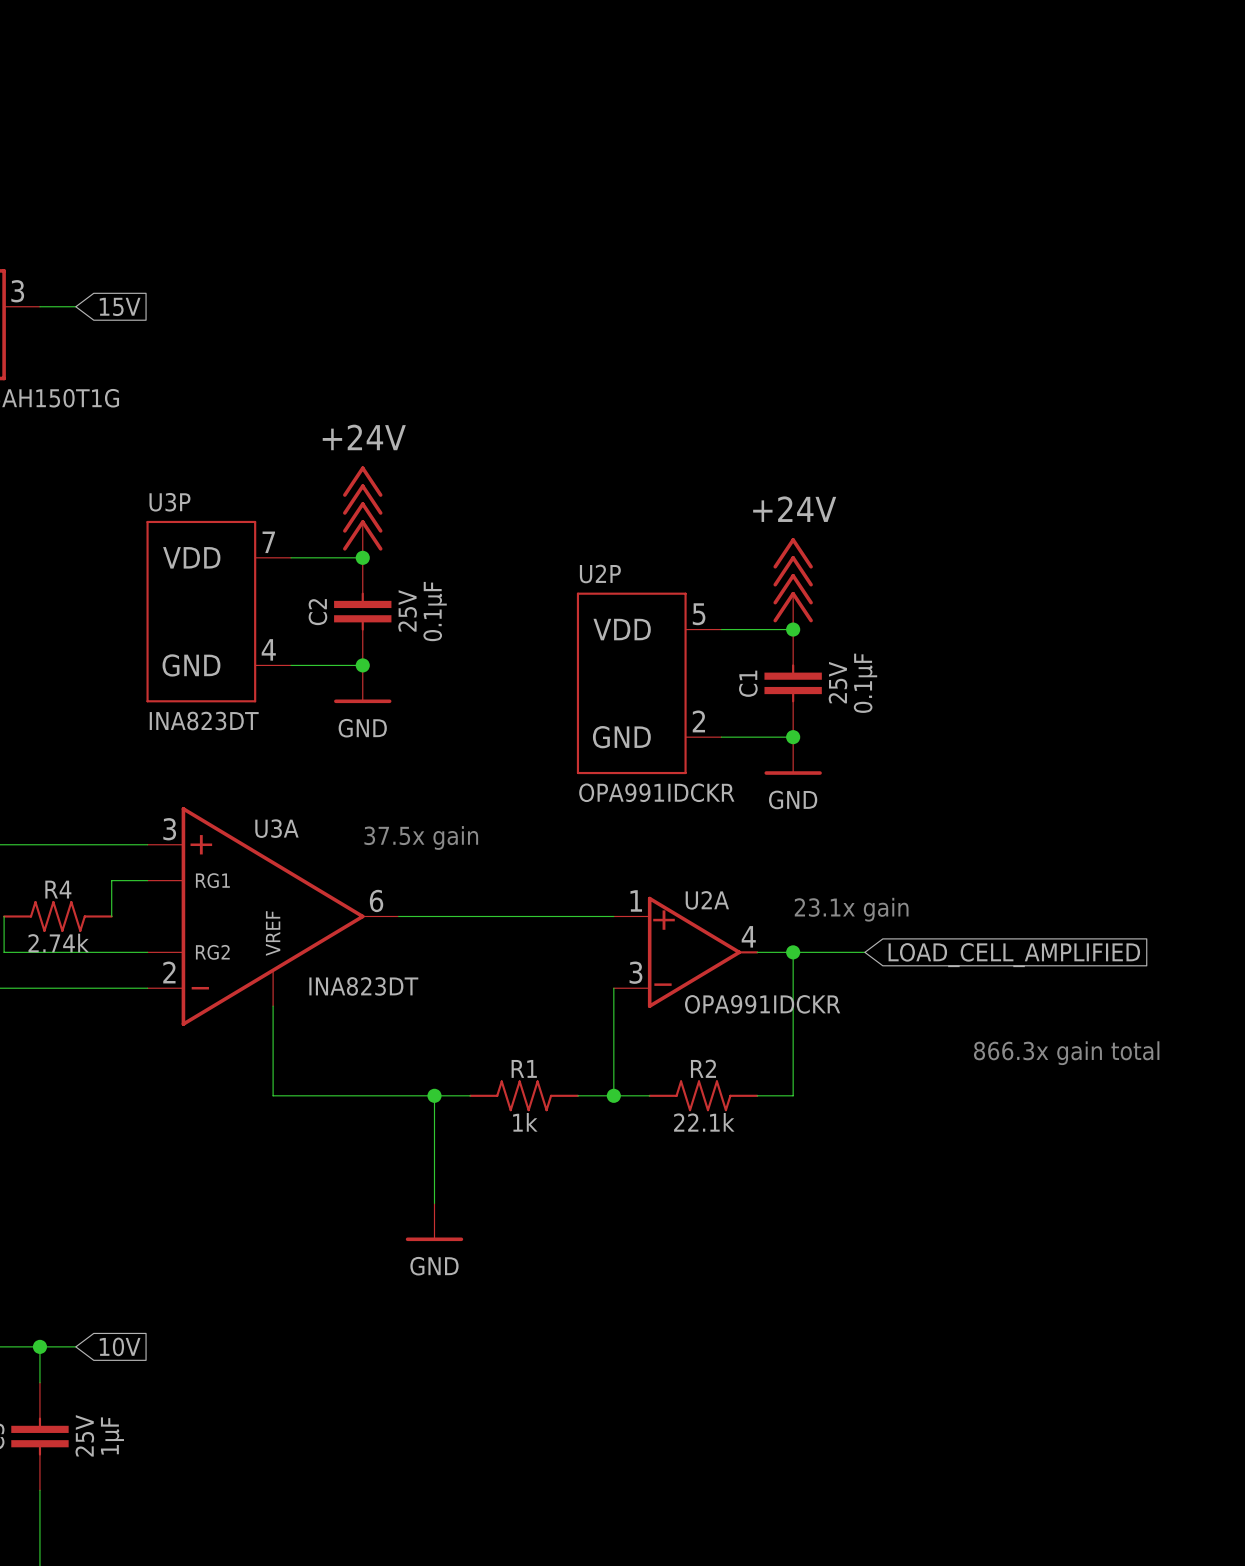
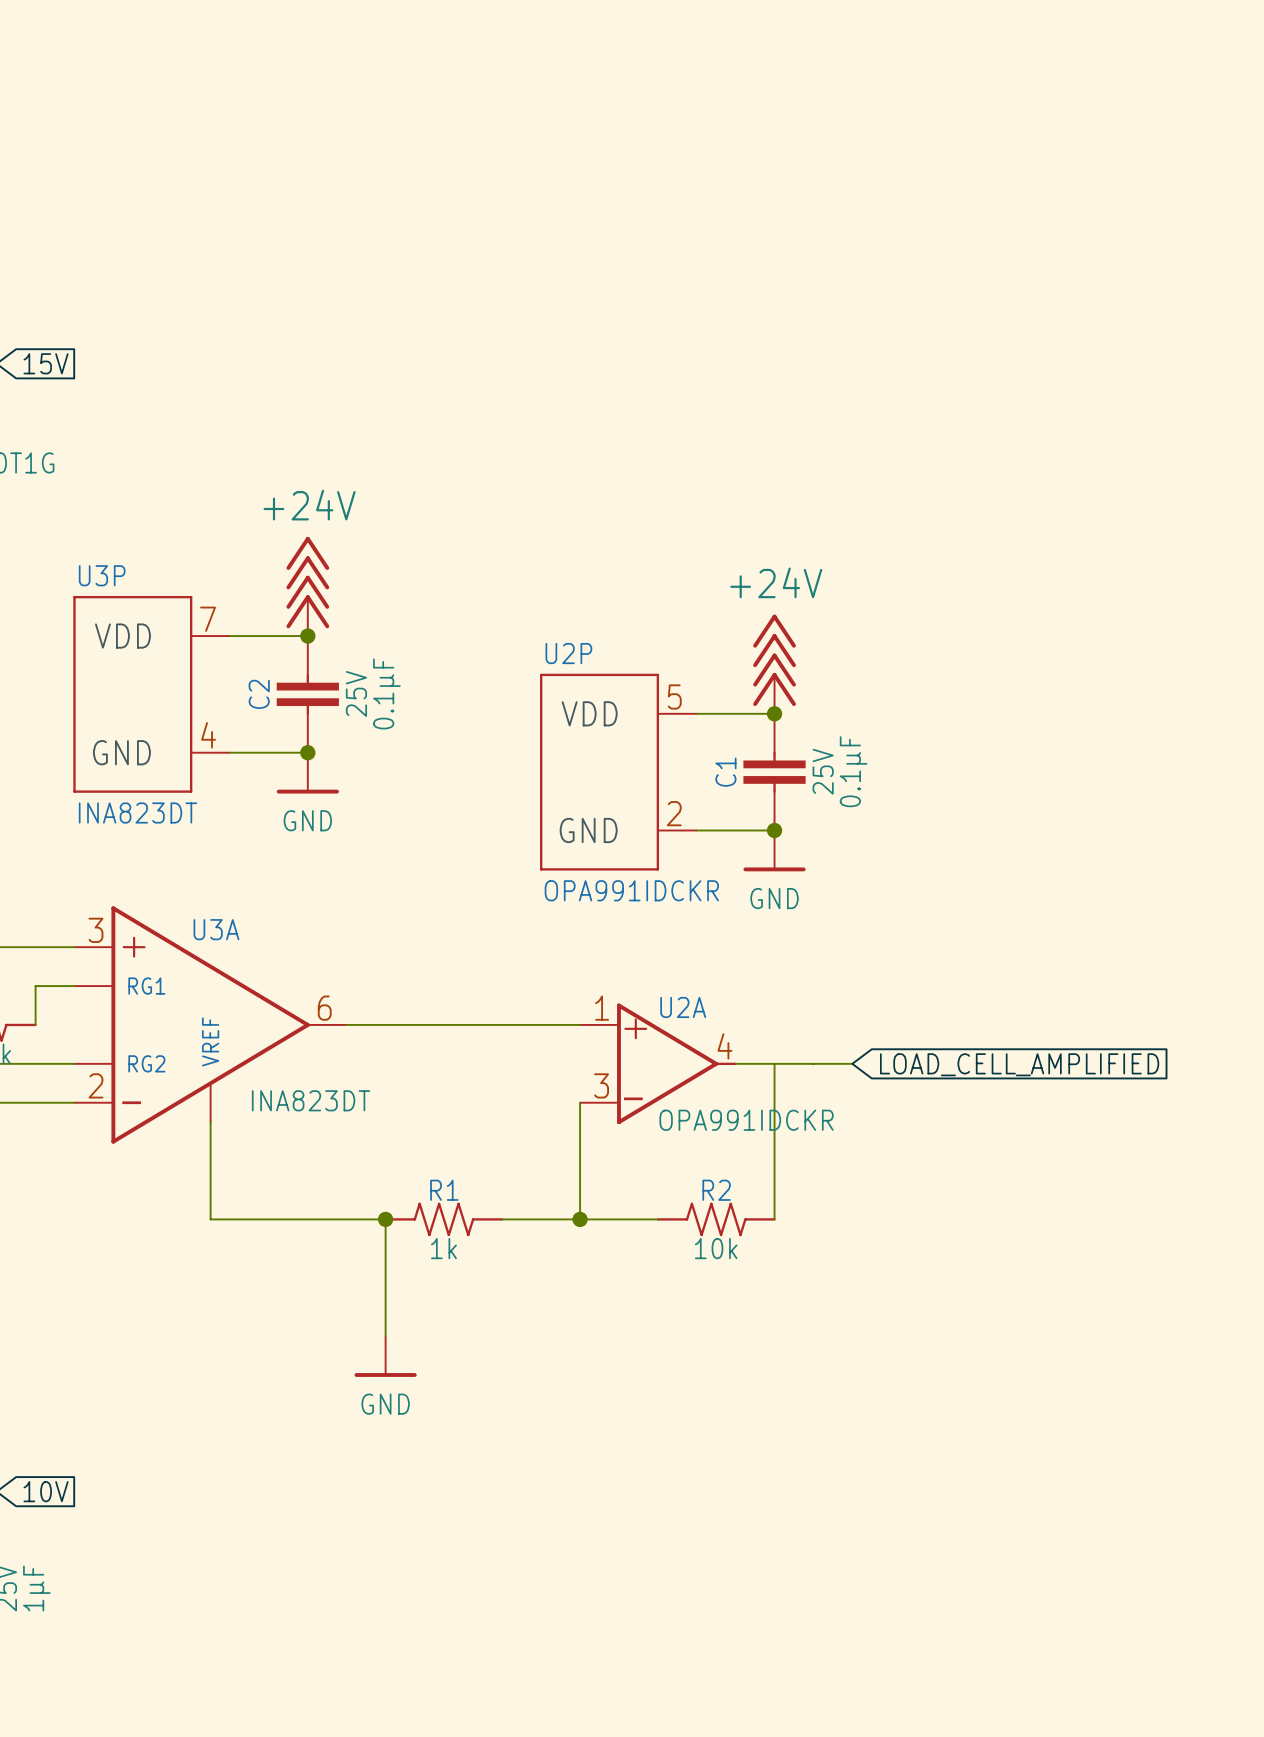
text: 37.5x gain (421, 837) -> none
text: 23.1x gain (851, 909) -> none
junction: (793, 952) -> none
text: 866.3x gain total (1066, 1053) -> none
R1 position: (524, 1095) -> (443, 1219)
R2 position: (703, 1095) -> (716, 1219)
R2 text: 22.1k (704, 1122) -> 10k (716, 1248)

